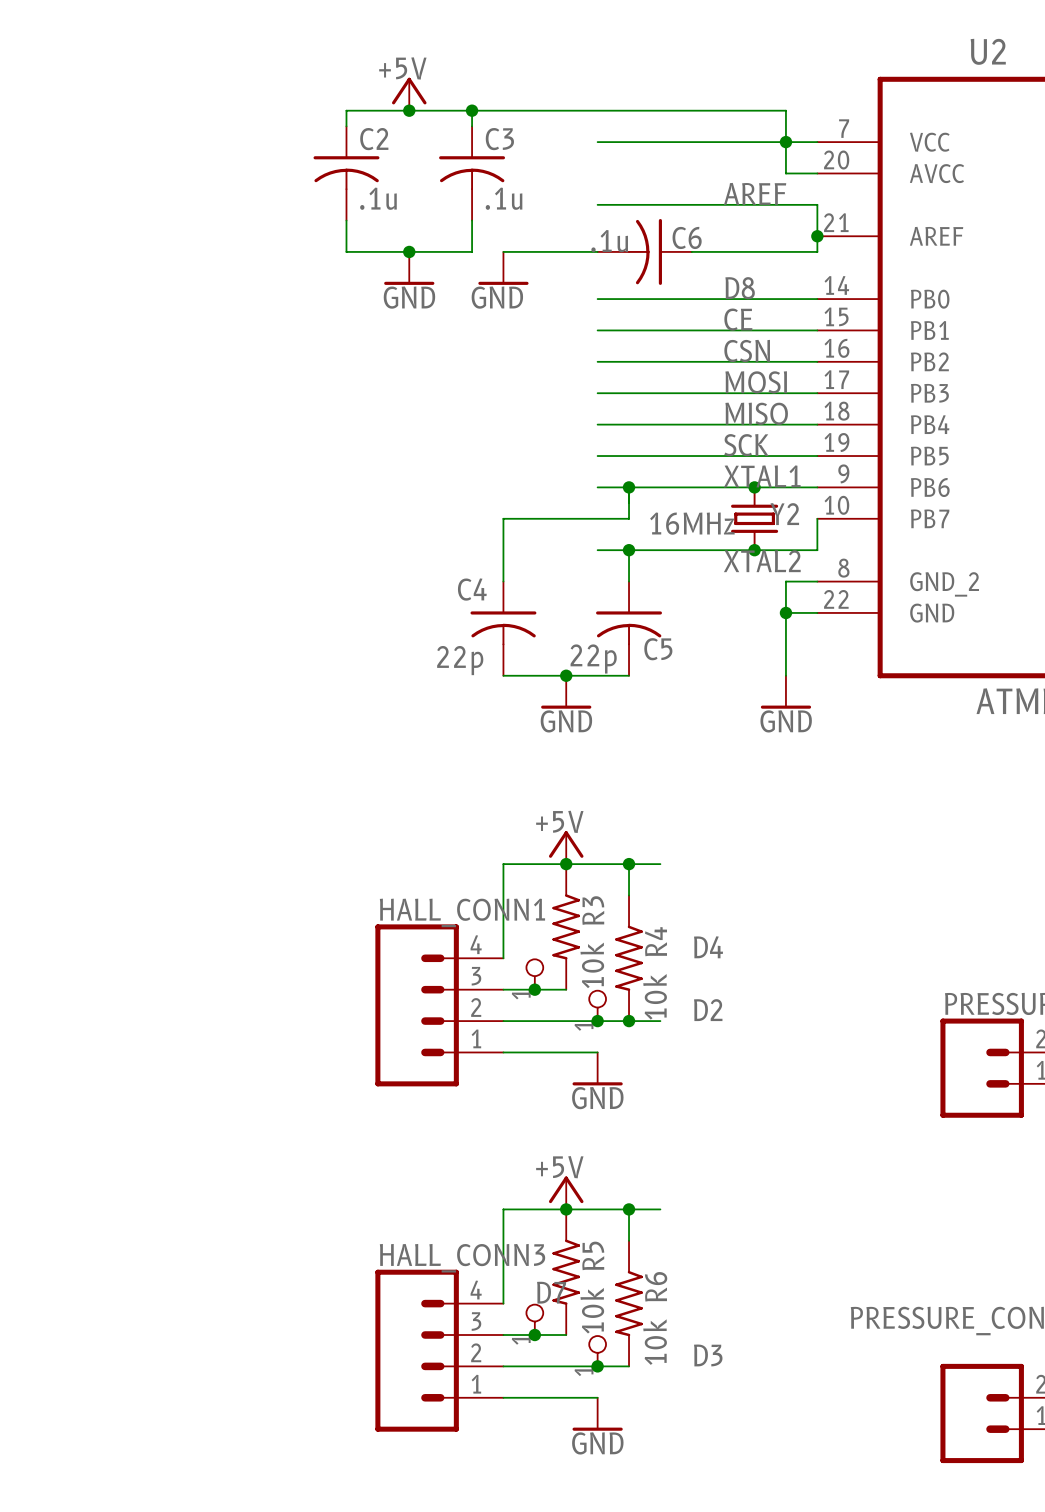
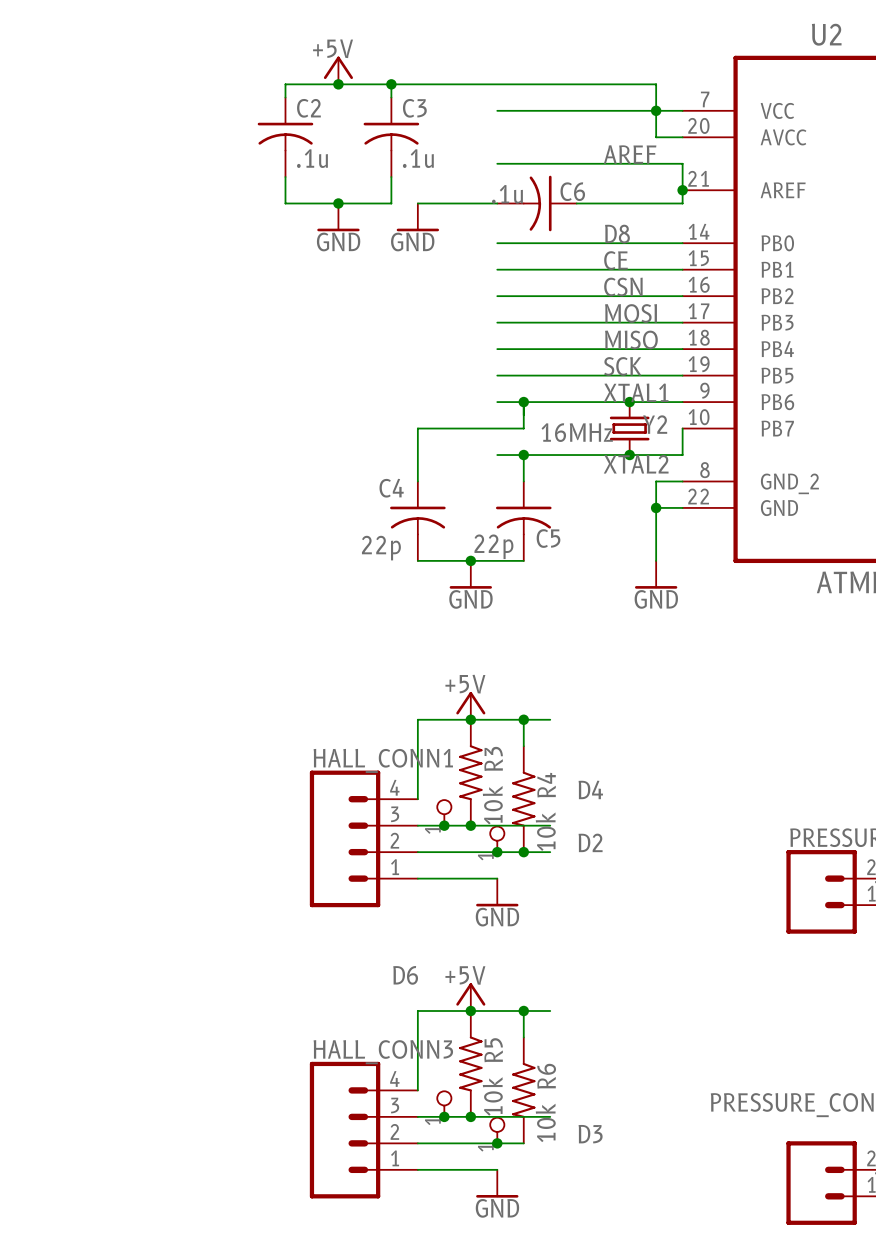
wire: none -> (470, 825) (550, 825)
junction: none -> (470, 825)
label: none -> D6 (405, 975)
label: D7 (551, 1292) -> none
wire: none -> (470, 1116) (550, 1116)
junction: none -> (470, 1116)

